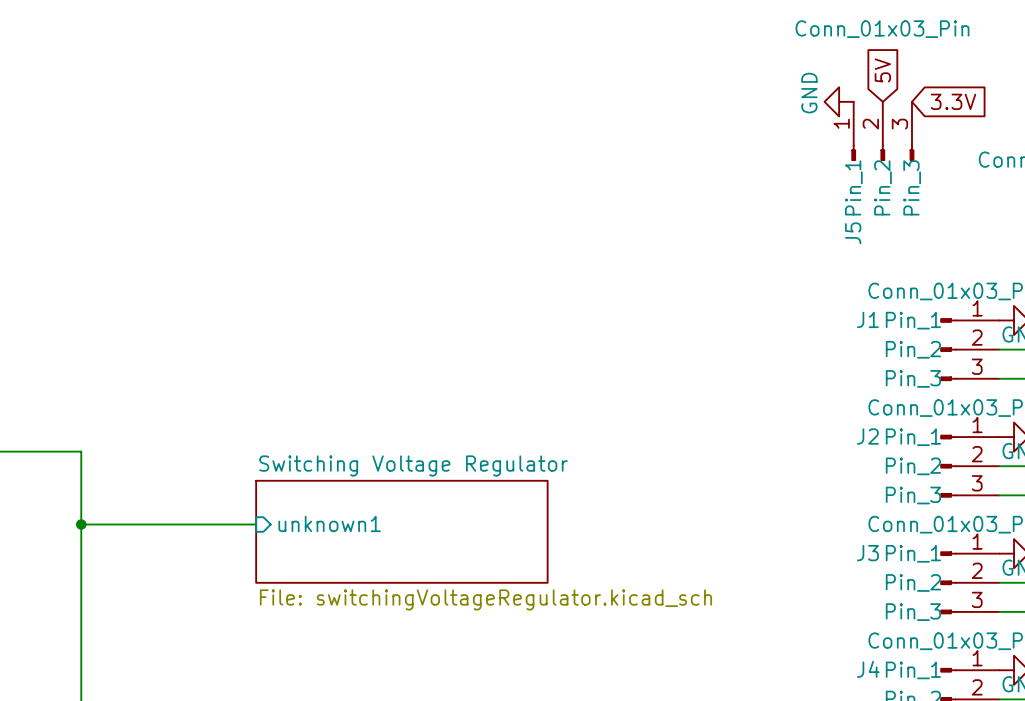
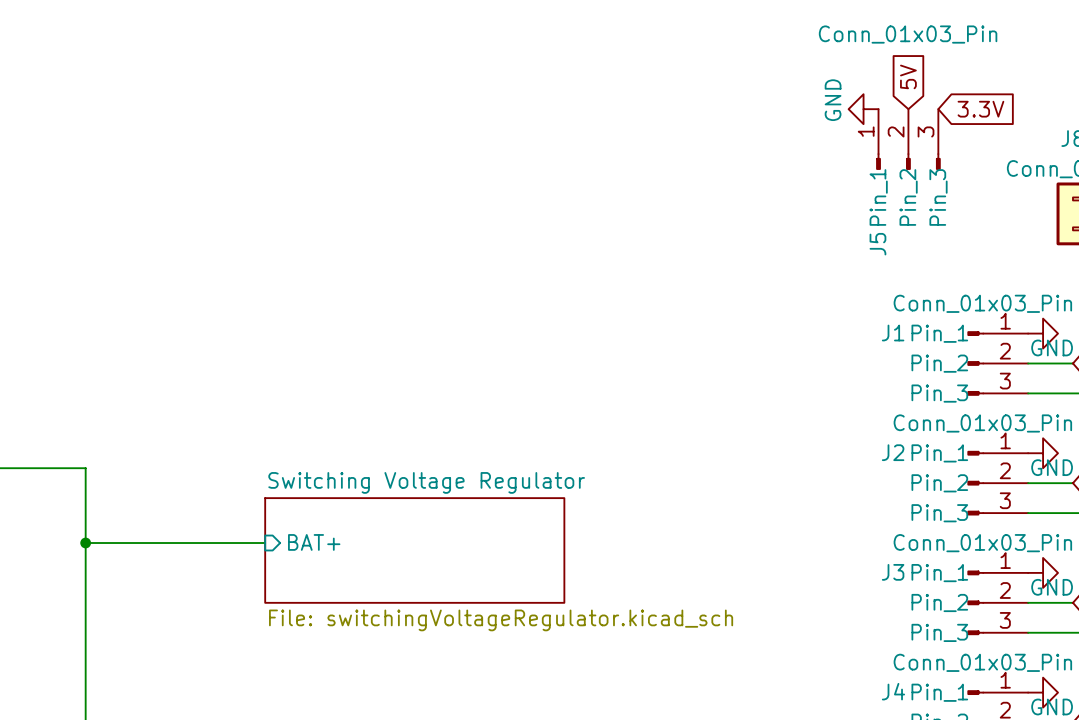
sheet pin: unknown1 (329, 523) -> BAT+ (314, 542)

